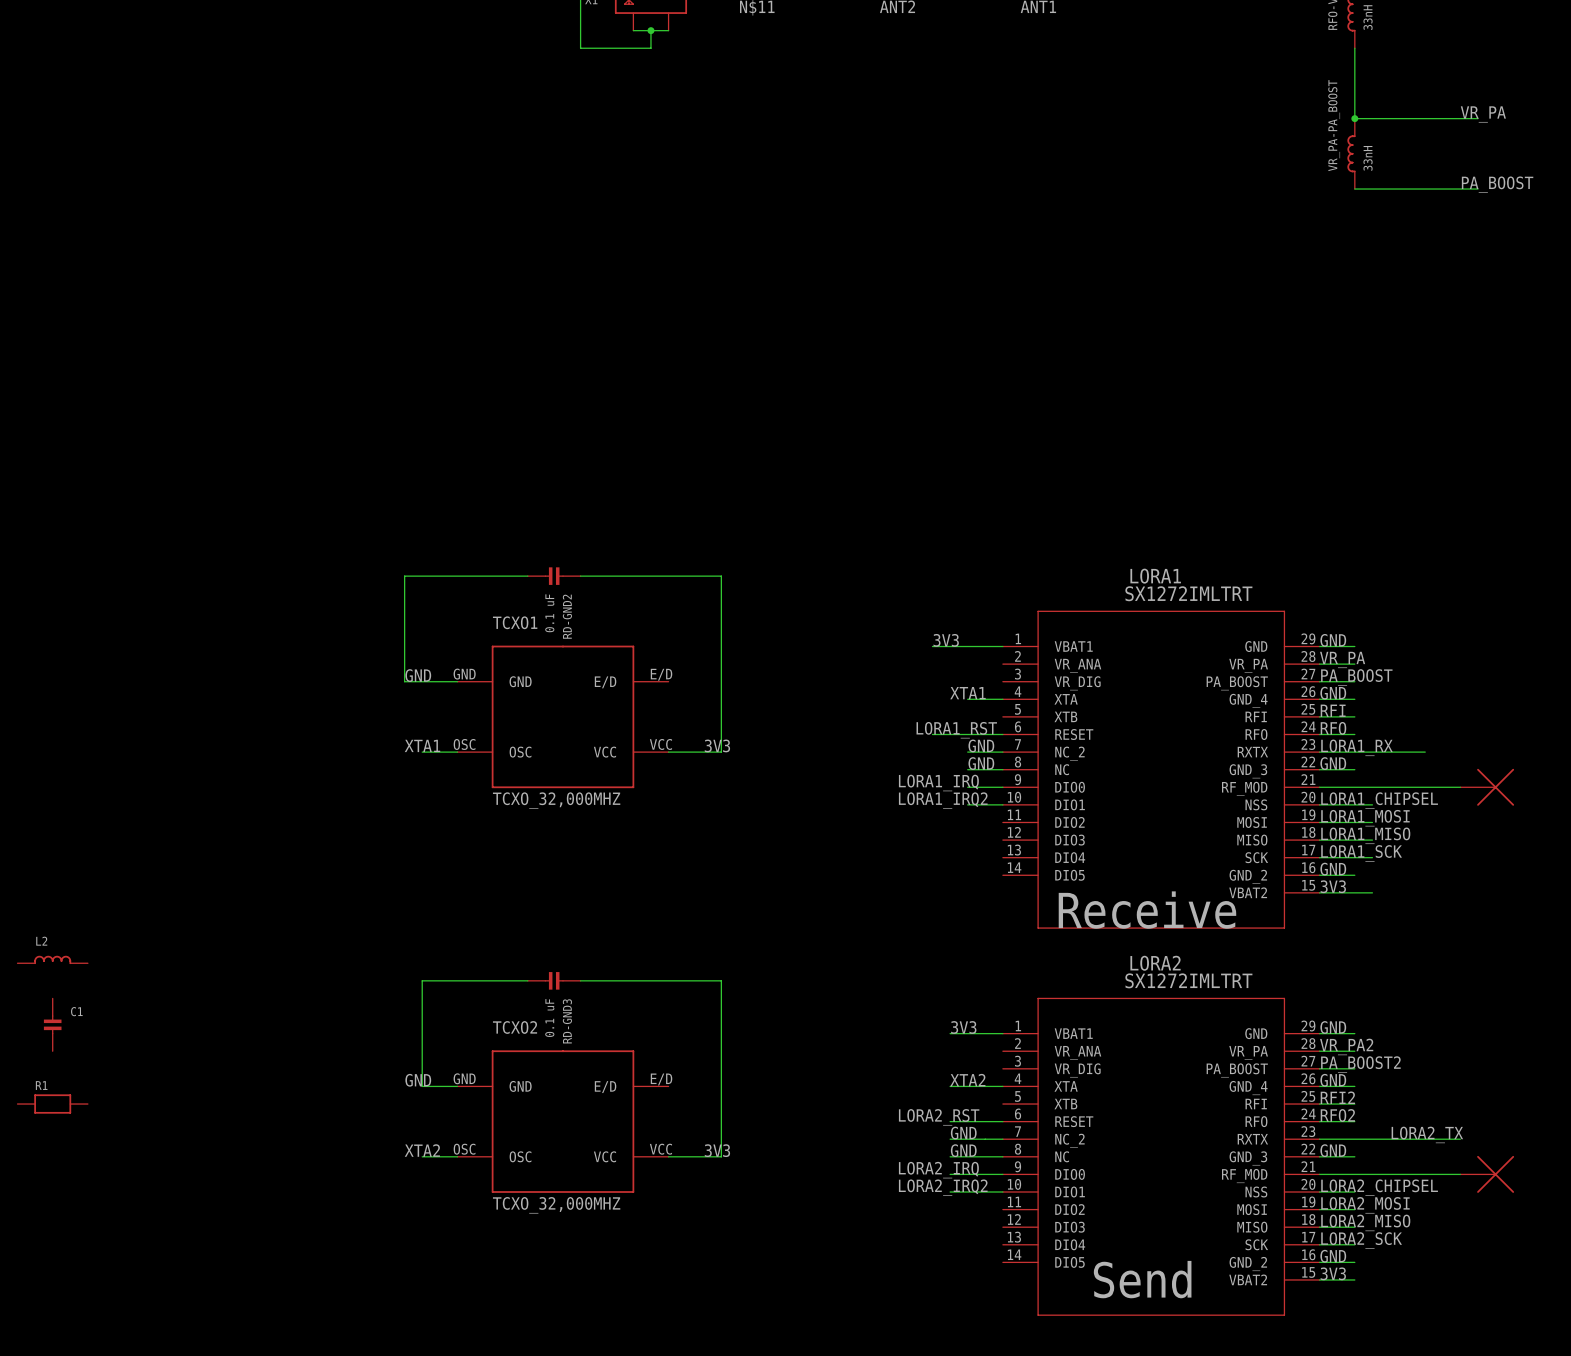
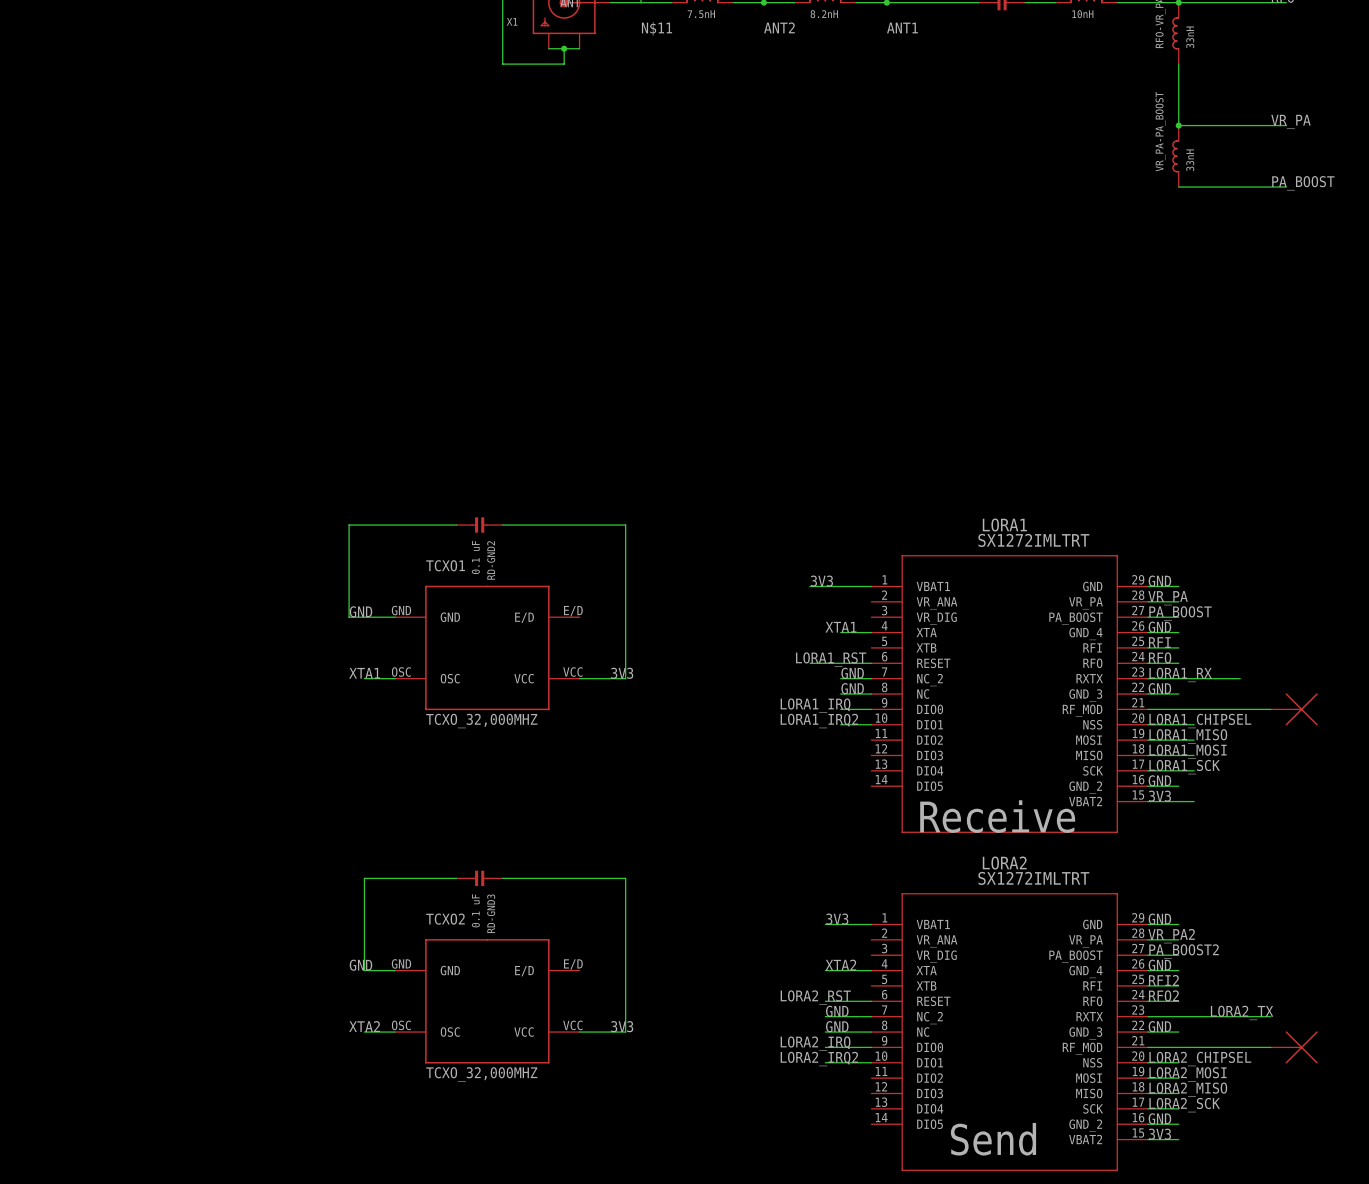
label: LORA1_MOSI (1365, 818) -> LORA1_MISO (1188, 736)
label: LORA1_MISO (1365, 835) -> LORA1_MOSI (1188, 751)
L2: (52, 959) -> none
C1: (52, 1024) -> none
R1: (52, 1104) -> none

